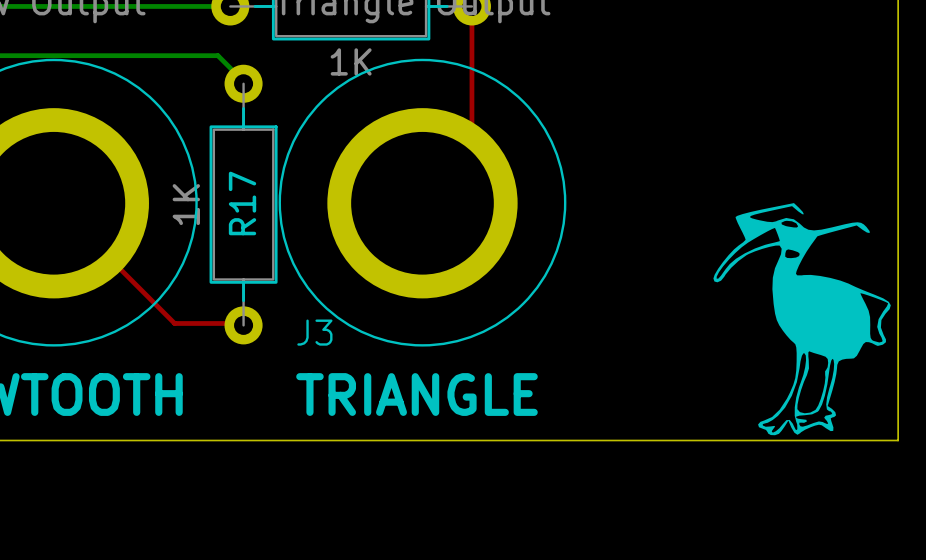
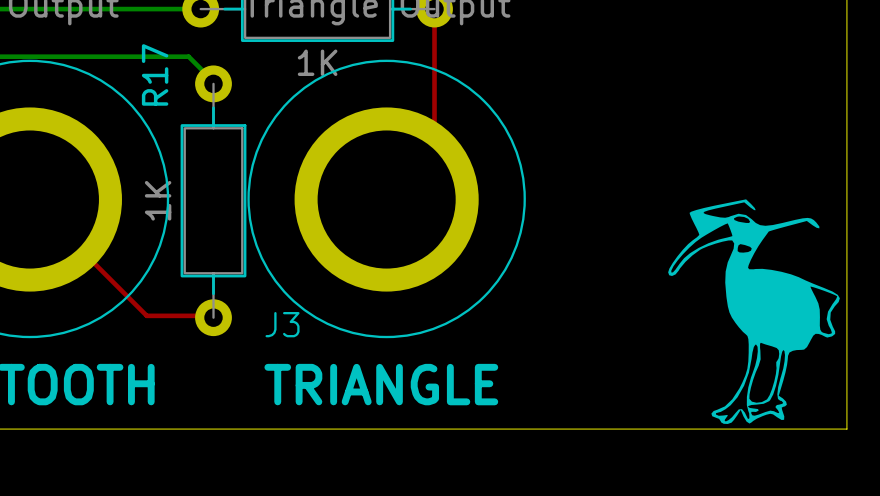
R17 name position: R17 (242, 203) -> R17 (155, 74)

